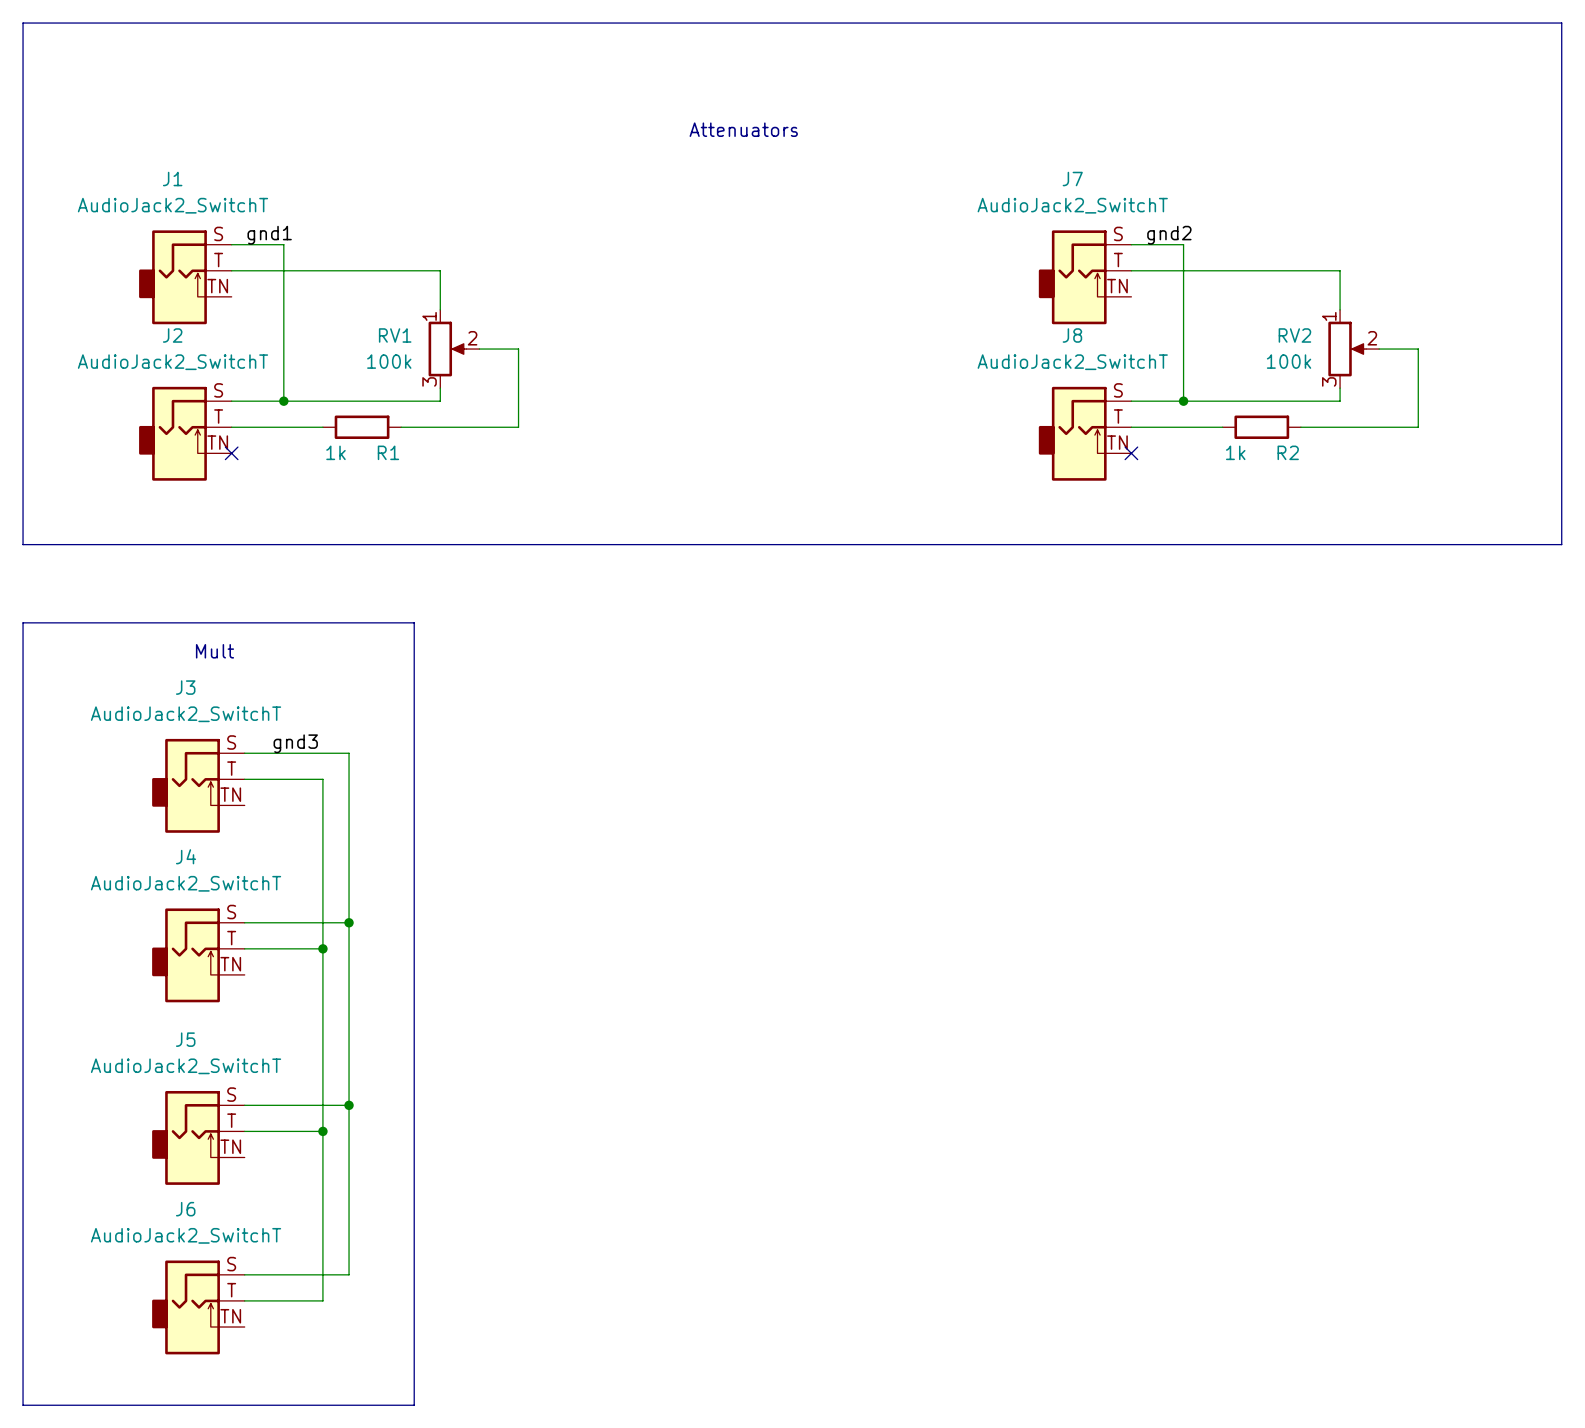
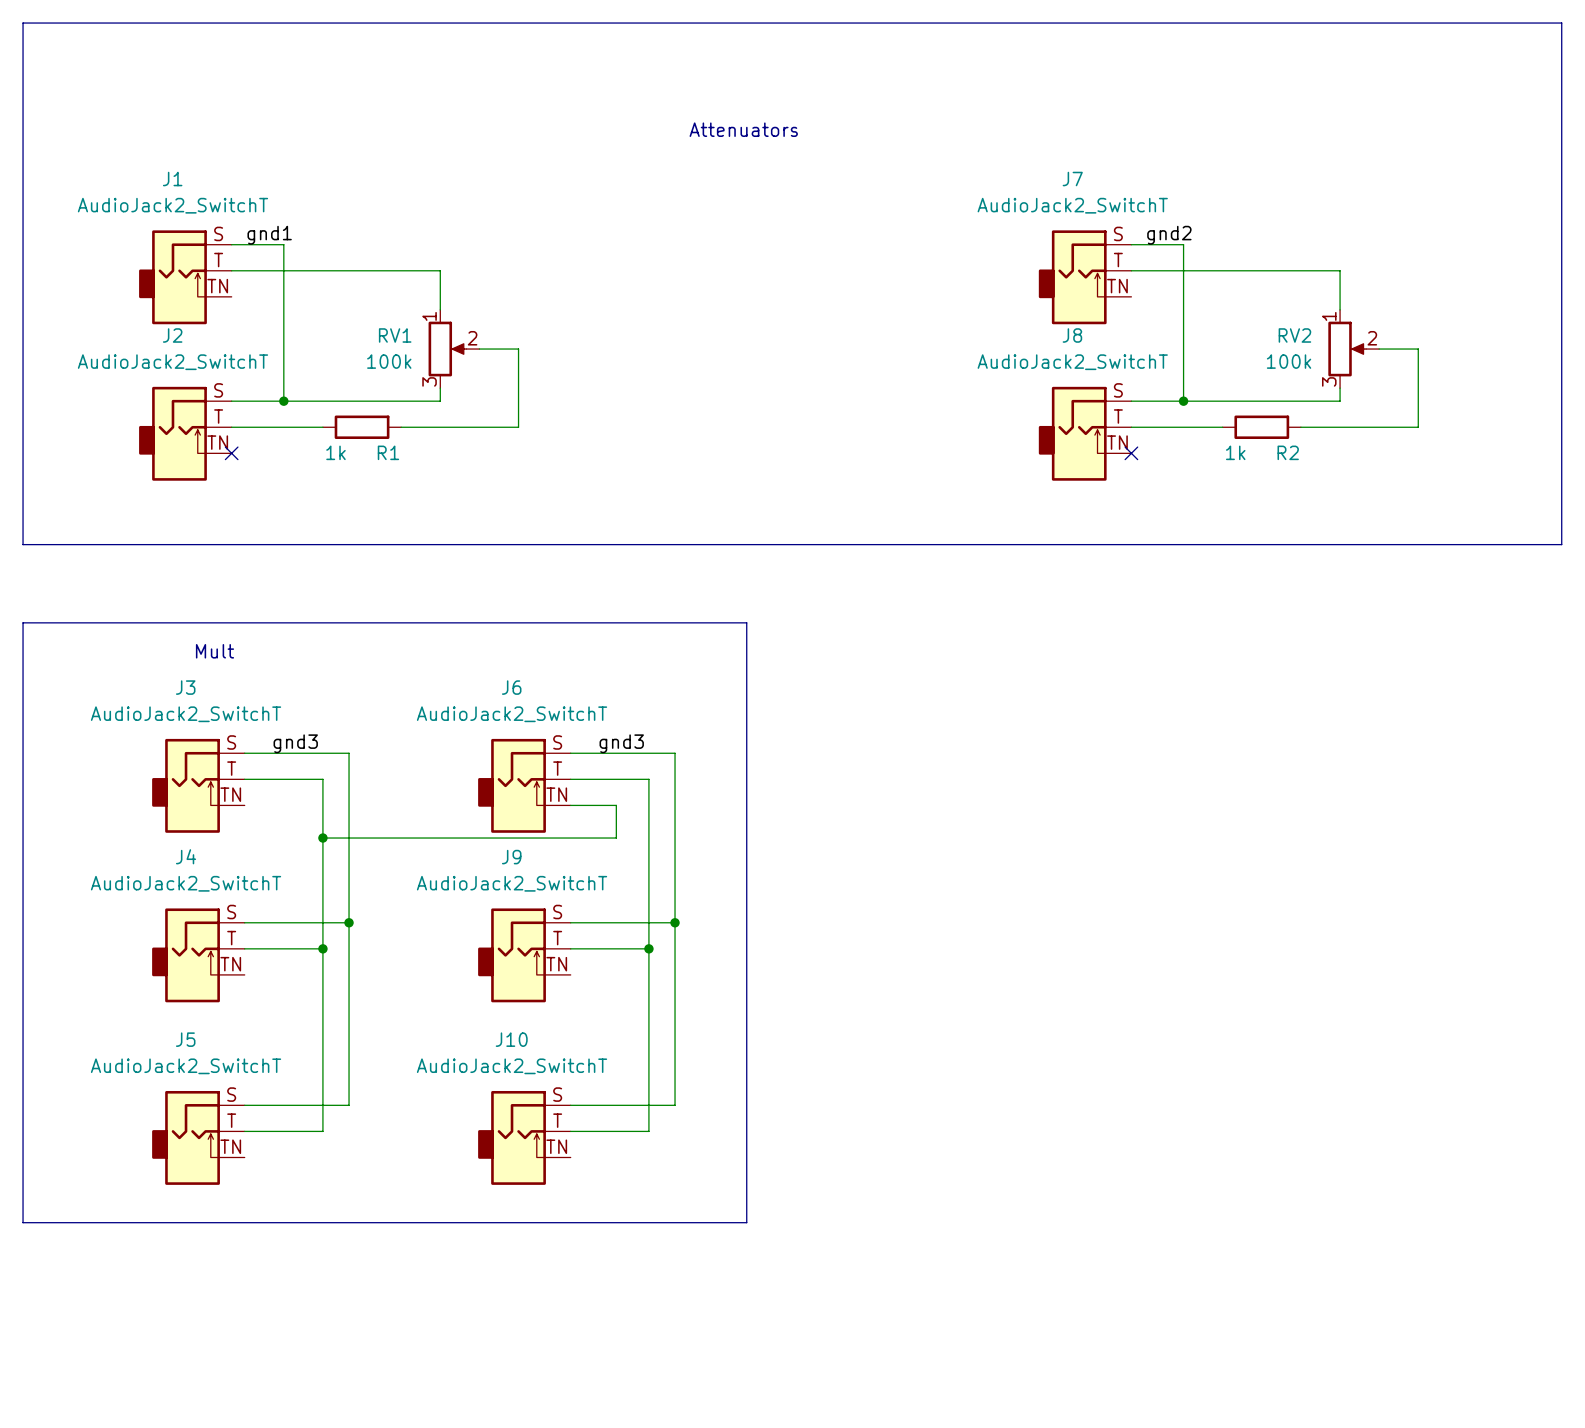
line: (414, 622) (414, 1405) (23, 1405) (23, 1222) -> (414, 622) (746, 622) (746, 1222) (23, 1222)
label: none -> gnd3 (621, 743)
wire: none -> (570, 753) (675, 753) (675, 1105) (570, 1105)
wire: none -> (570, 779) (648, 779) (648, 1131) (570, 1131)
wire: none -> (570, 805) (616, 805) (616, 838) (322, 838)
junction: none -> (322, 838)
wire: none -> (570, 922) (675, 922)
junction: none -> (675, 922)
wire: none -> (570, 948) (648, 948)
junction: none -> (648, 948)
J9: none -> AudioJack2_SwitchT (524, 955)
wire: (349, 1105) (349, 1274) (244, 1274) -> none
junction: (349, 1105) -> none
wire: (322, 1131) (322, 1300) (244, 1300) -> none
junction: (322, 1131) -> none
J10: none -> AudioJack2_SwitchT (524, 1137)
J6 position: (198, 1307) -> (524, 785)

